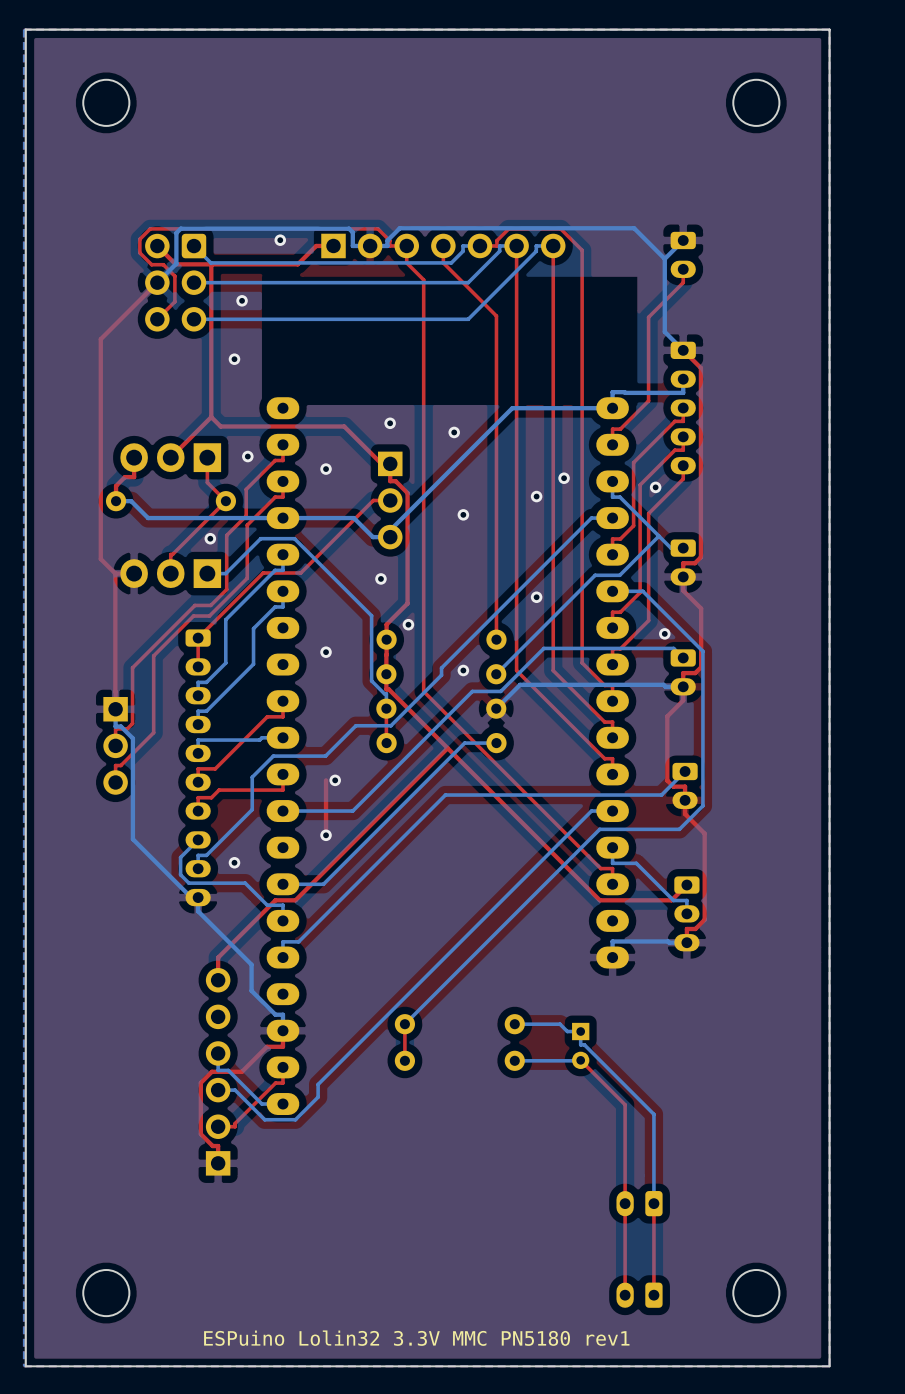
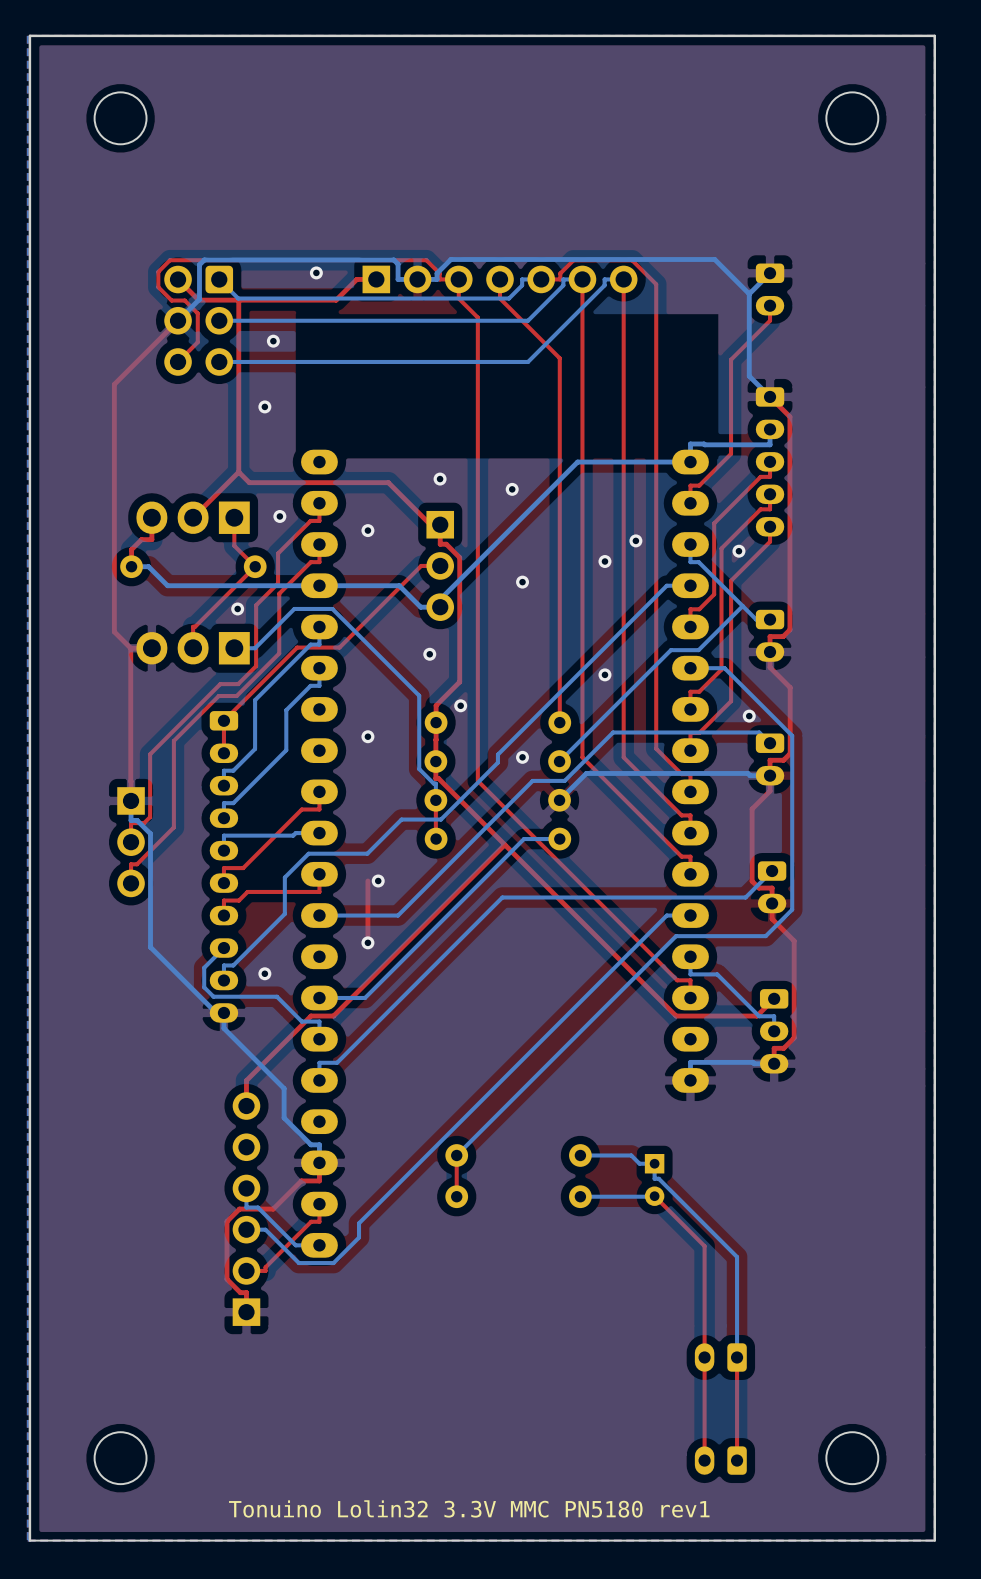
text: ESPuino Lolin32 3.3V MMC PN5180 rev1 (416, 1338) -> Tonuino Lolin32 3.3V MMC PN5180 rev1 (469, 1508)

